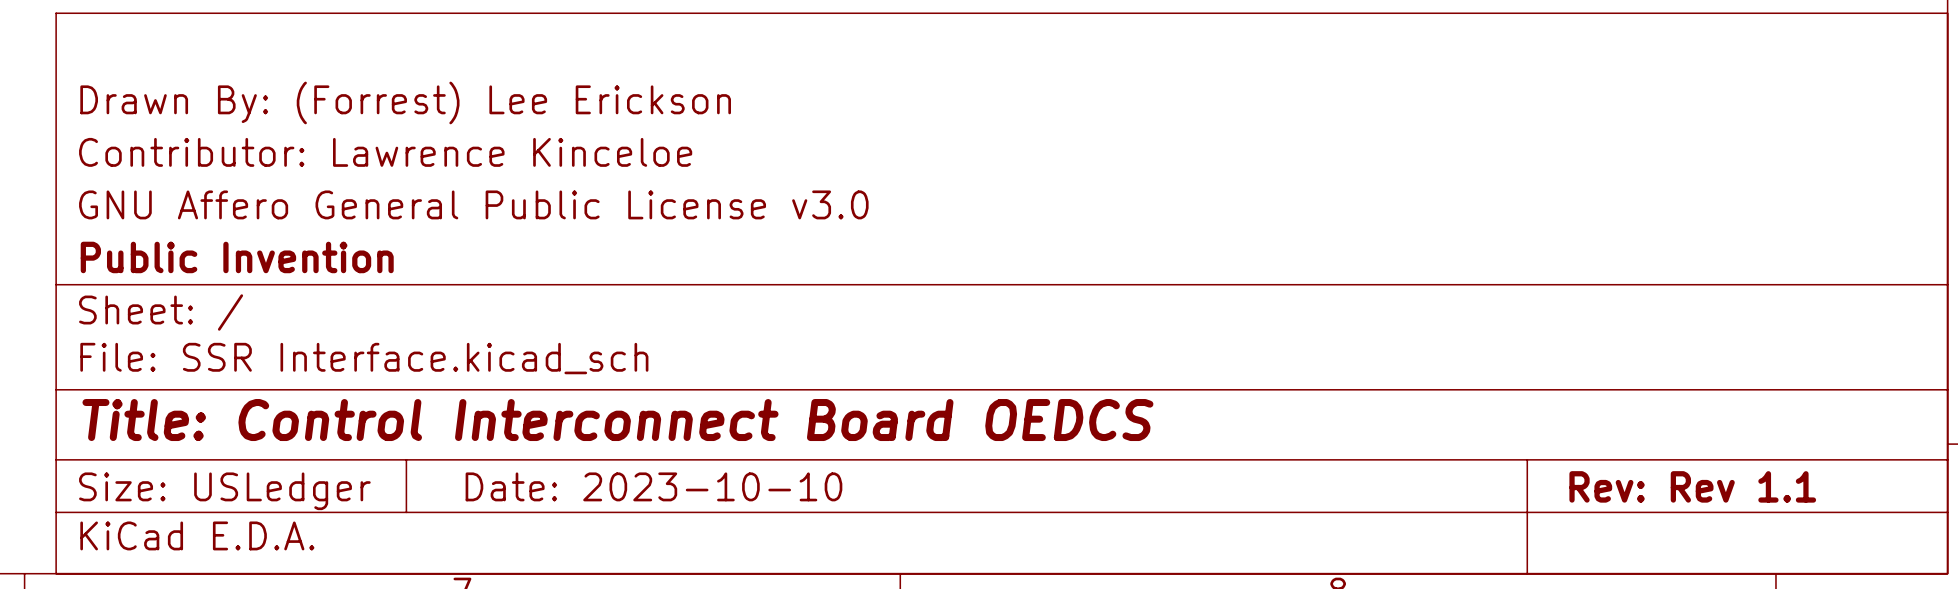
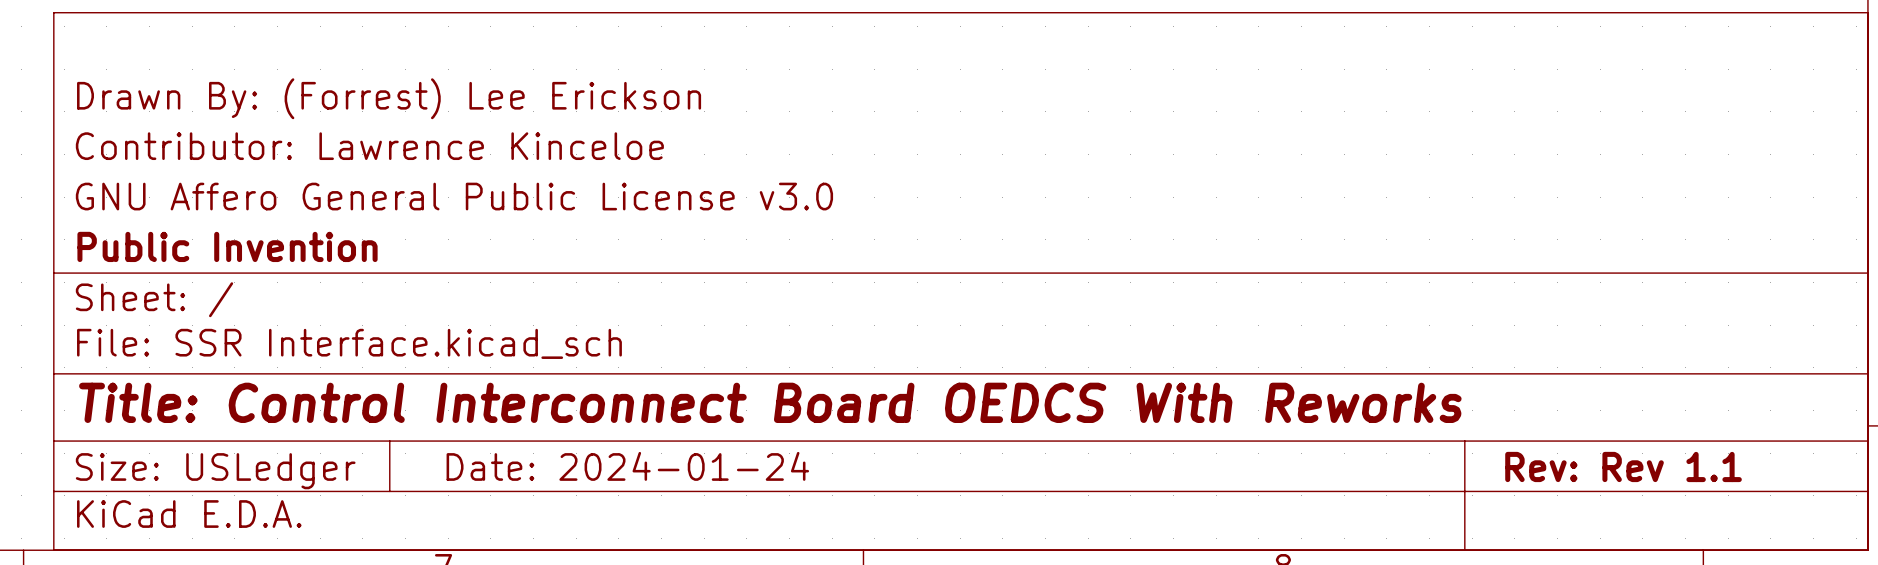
title block: Title: Control Interconnect Board OEDCS (617, 420) -> Title: Control Interconnect Board OEDCS With Reworks (770, 402)
title block: Date: 2023-10-10 (653, 486) -> Date: 2024-01-24 (627, 466)

